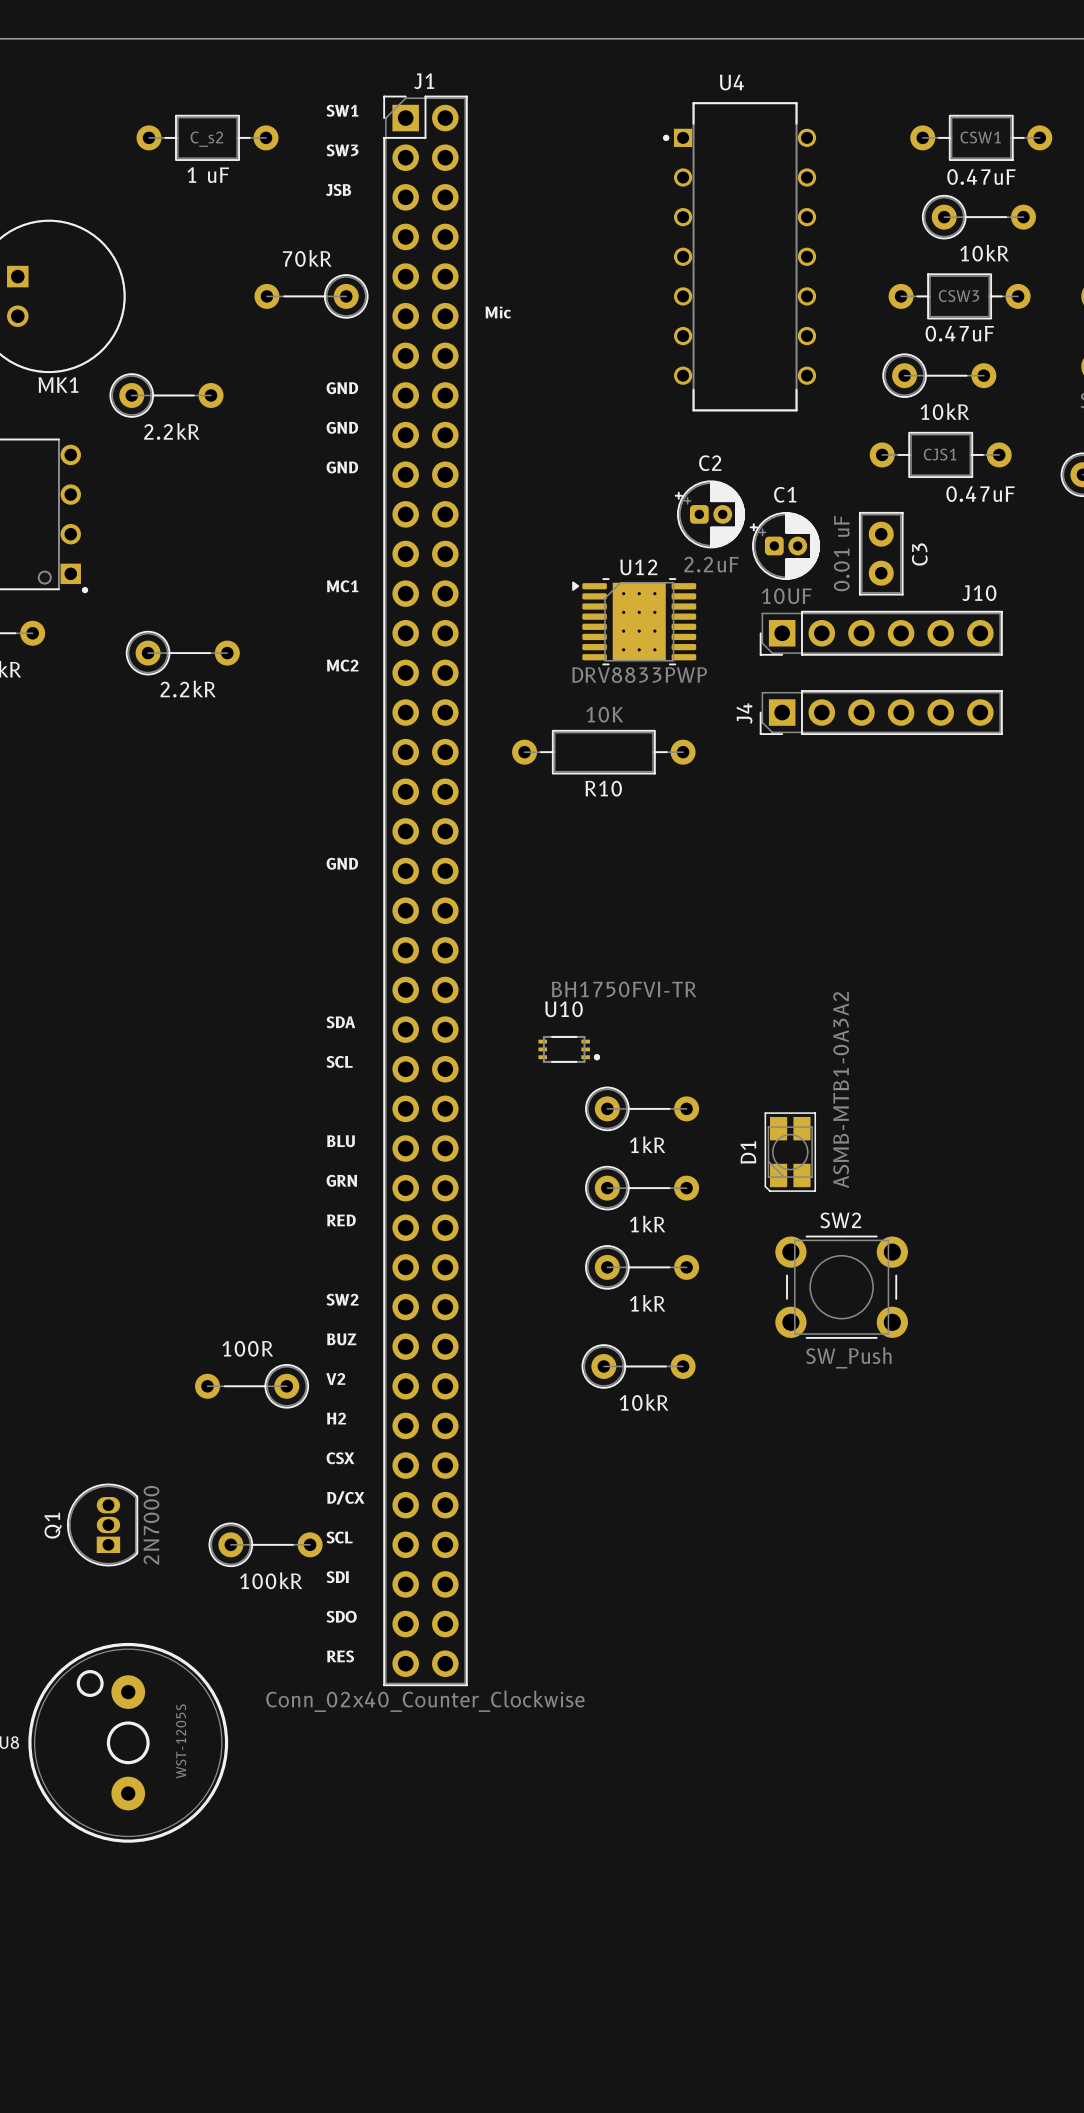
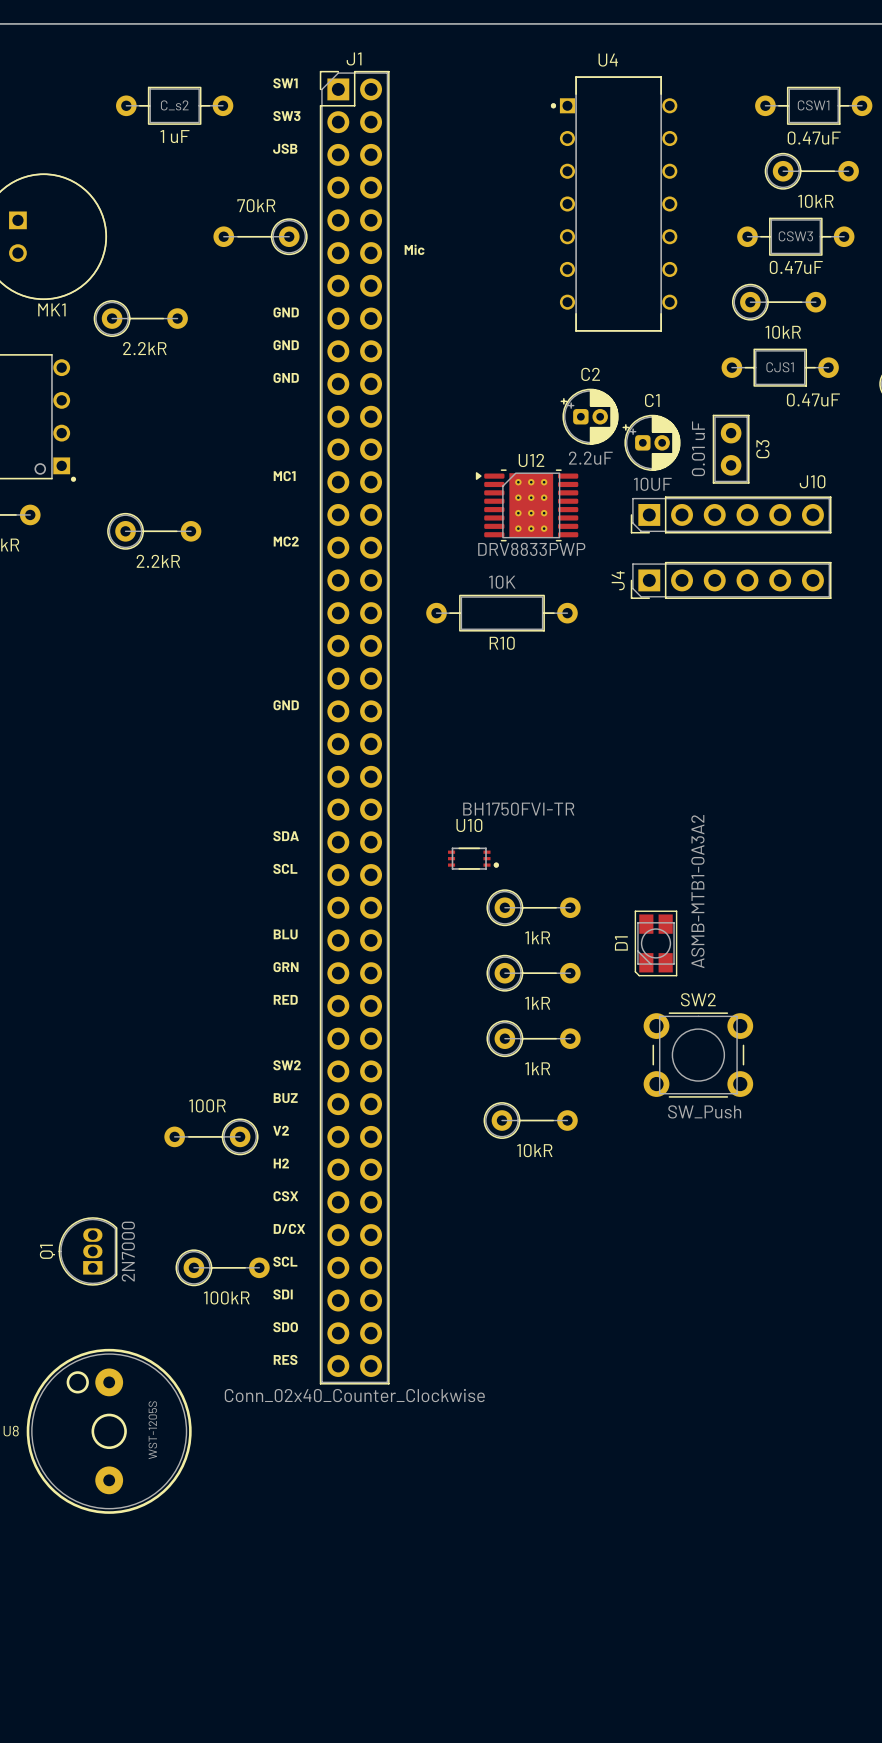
U8 footprint: [28, 1642, 229, 1843] -> [26, 1348, 192, 1514]

